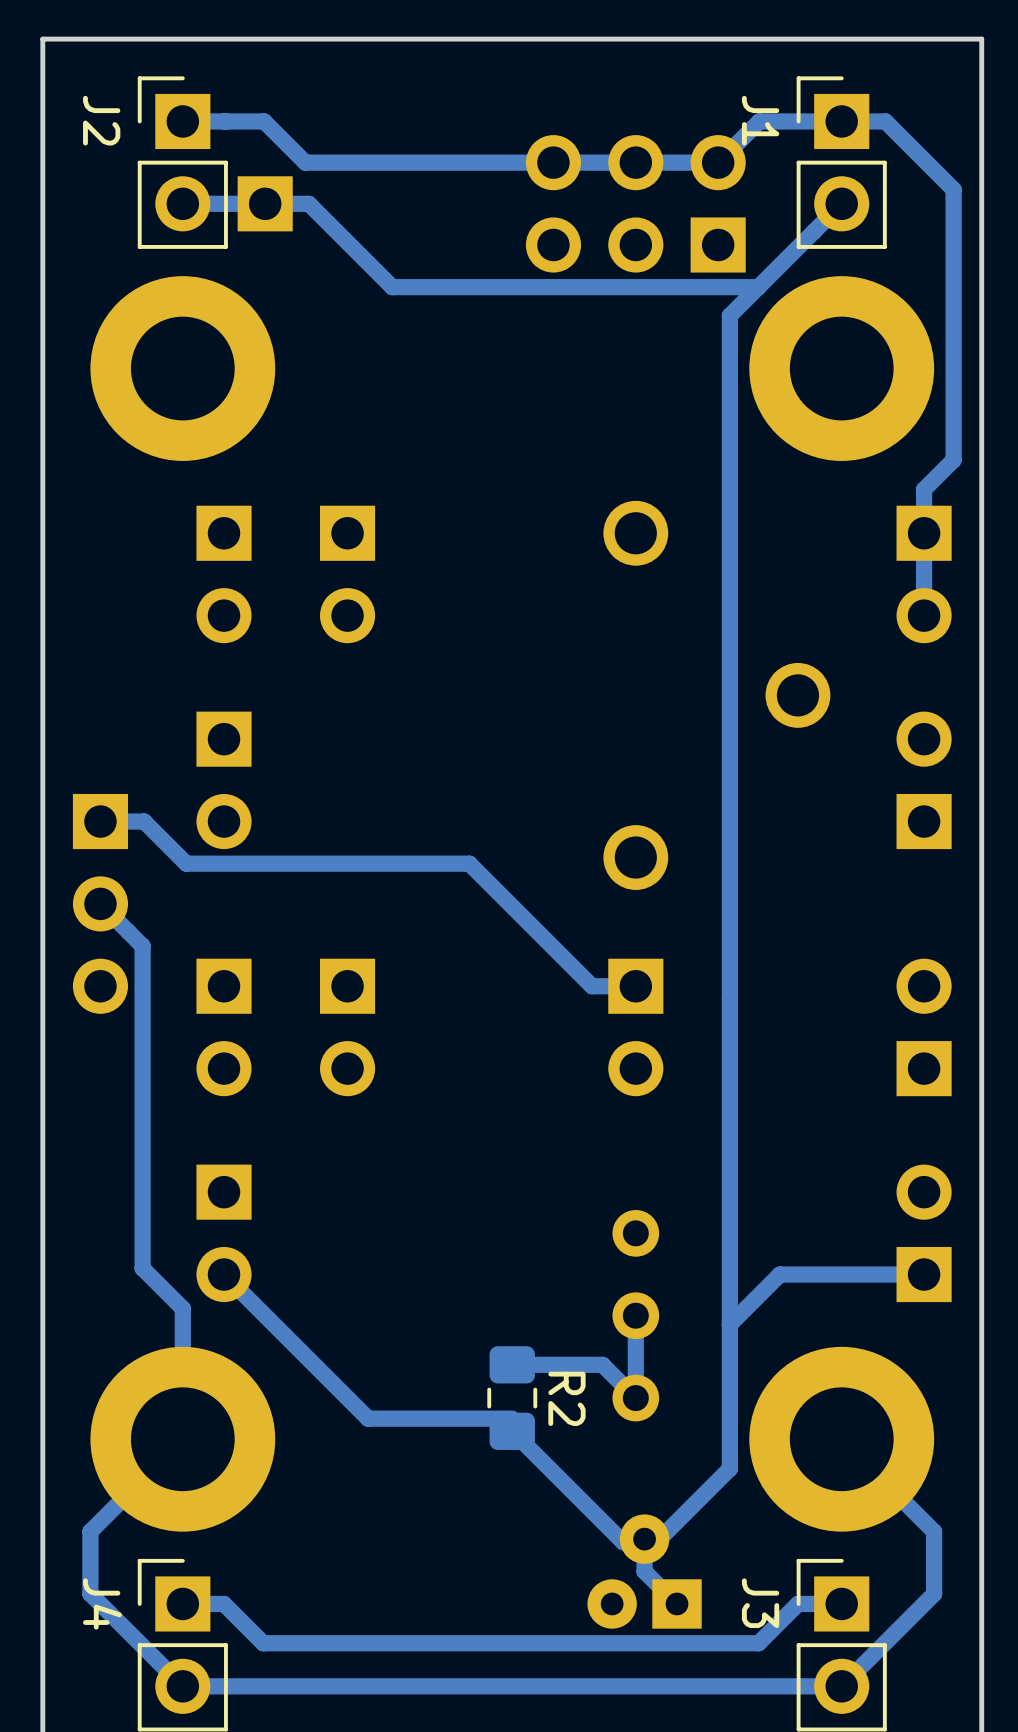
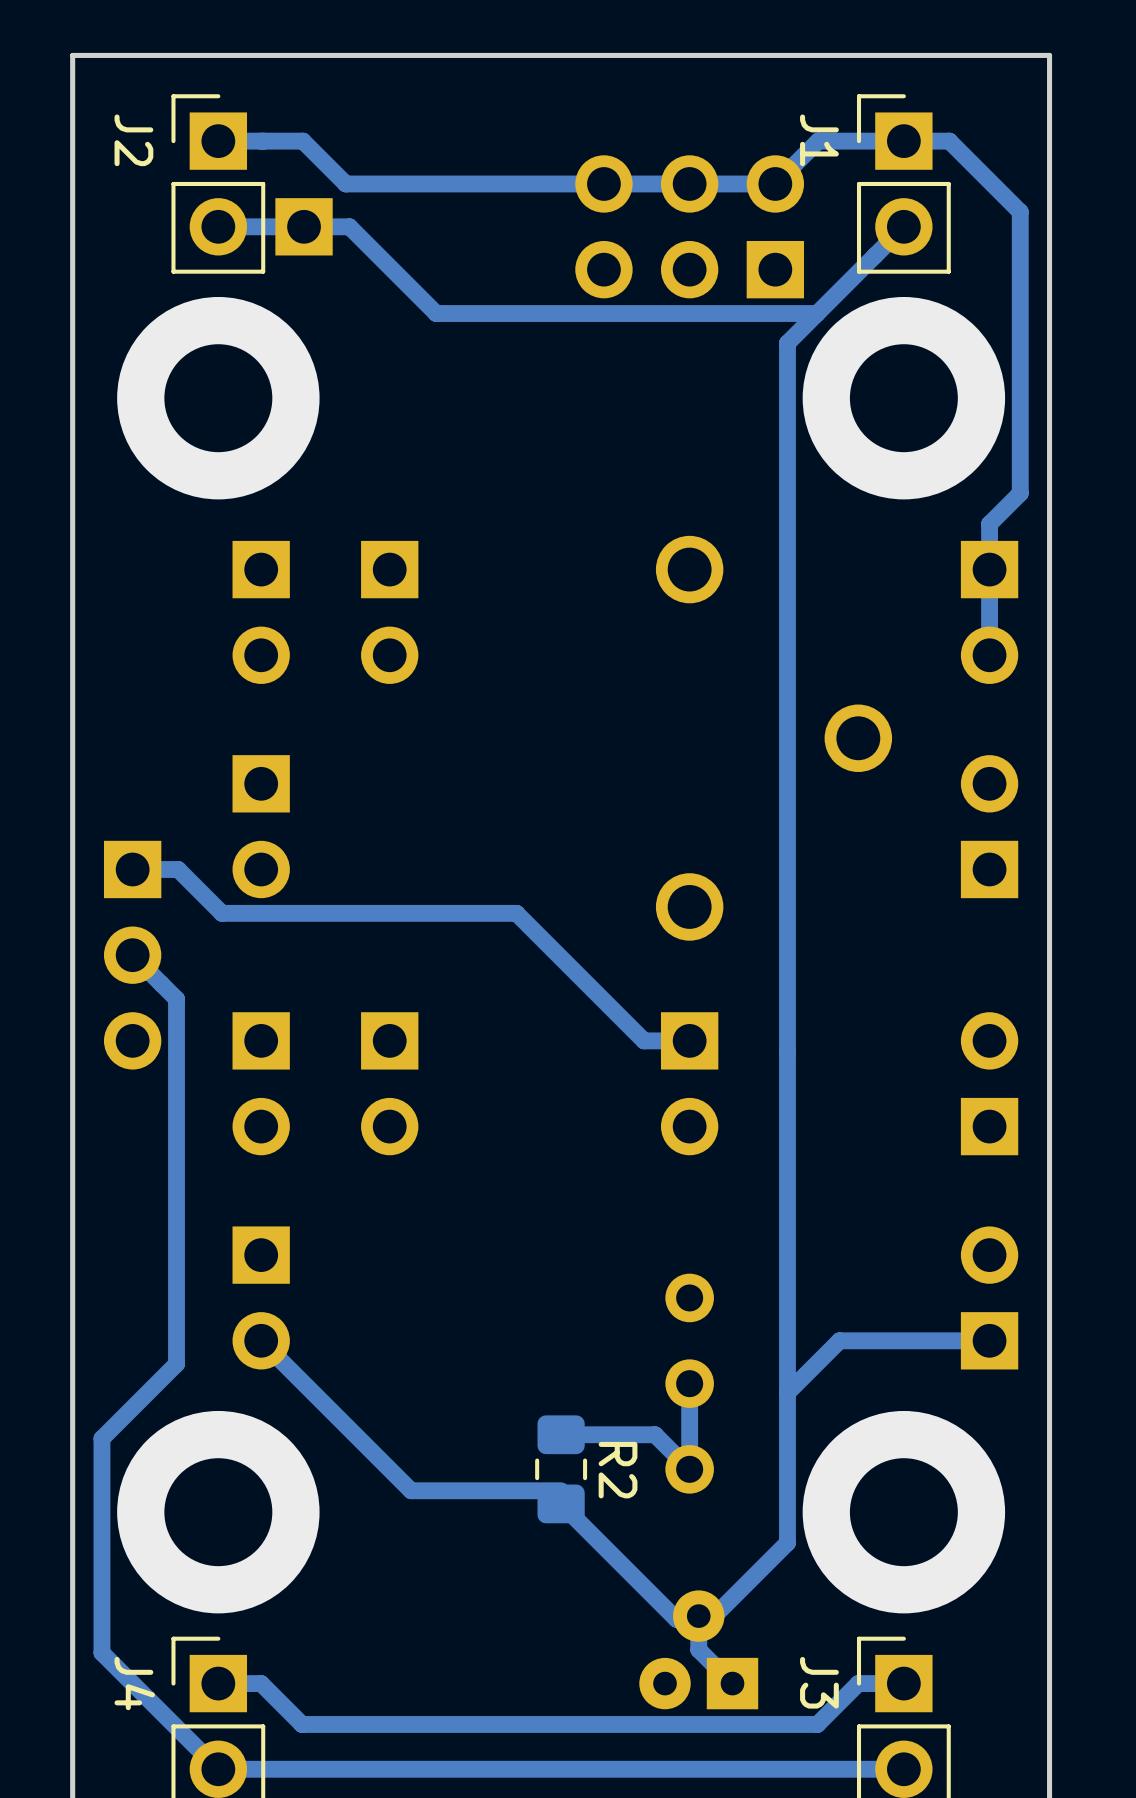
part: (182, 368) -> none
via: none -> (218, 398)
part: (841, 368) -> none
via: none -> (903, 398)
track: (142, 1268) (182, 1308) (182, 1439) (90, 1531) (90, 1593) -> (176, 1334) (176, 1364) (101, 1438) (101, 1652) (122, 1673)
part: (182, 1439) -> none
via: none -> (218, 1512)
track: (841, 1439) (934, 1531) (934, 1593) (841, 1686) -> none
part: (841, 1439) -> none
via: none -> (903, 1512)

